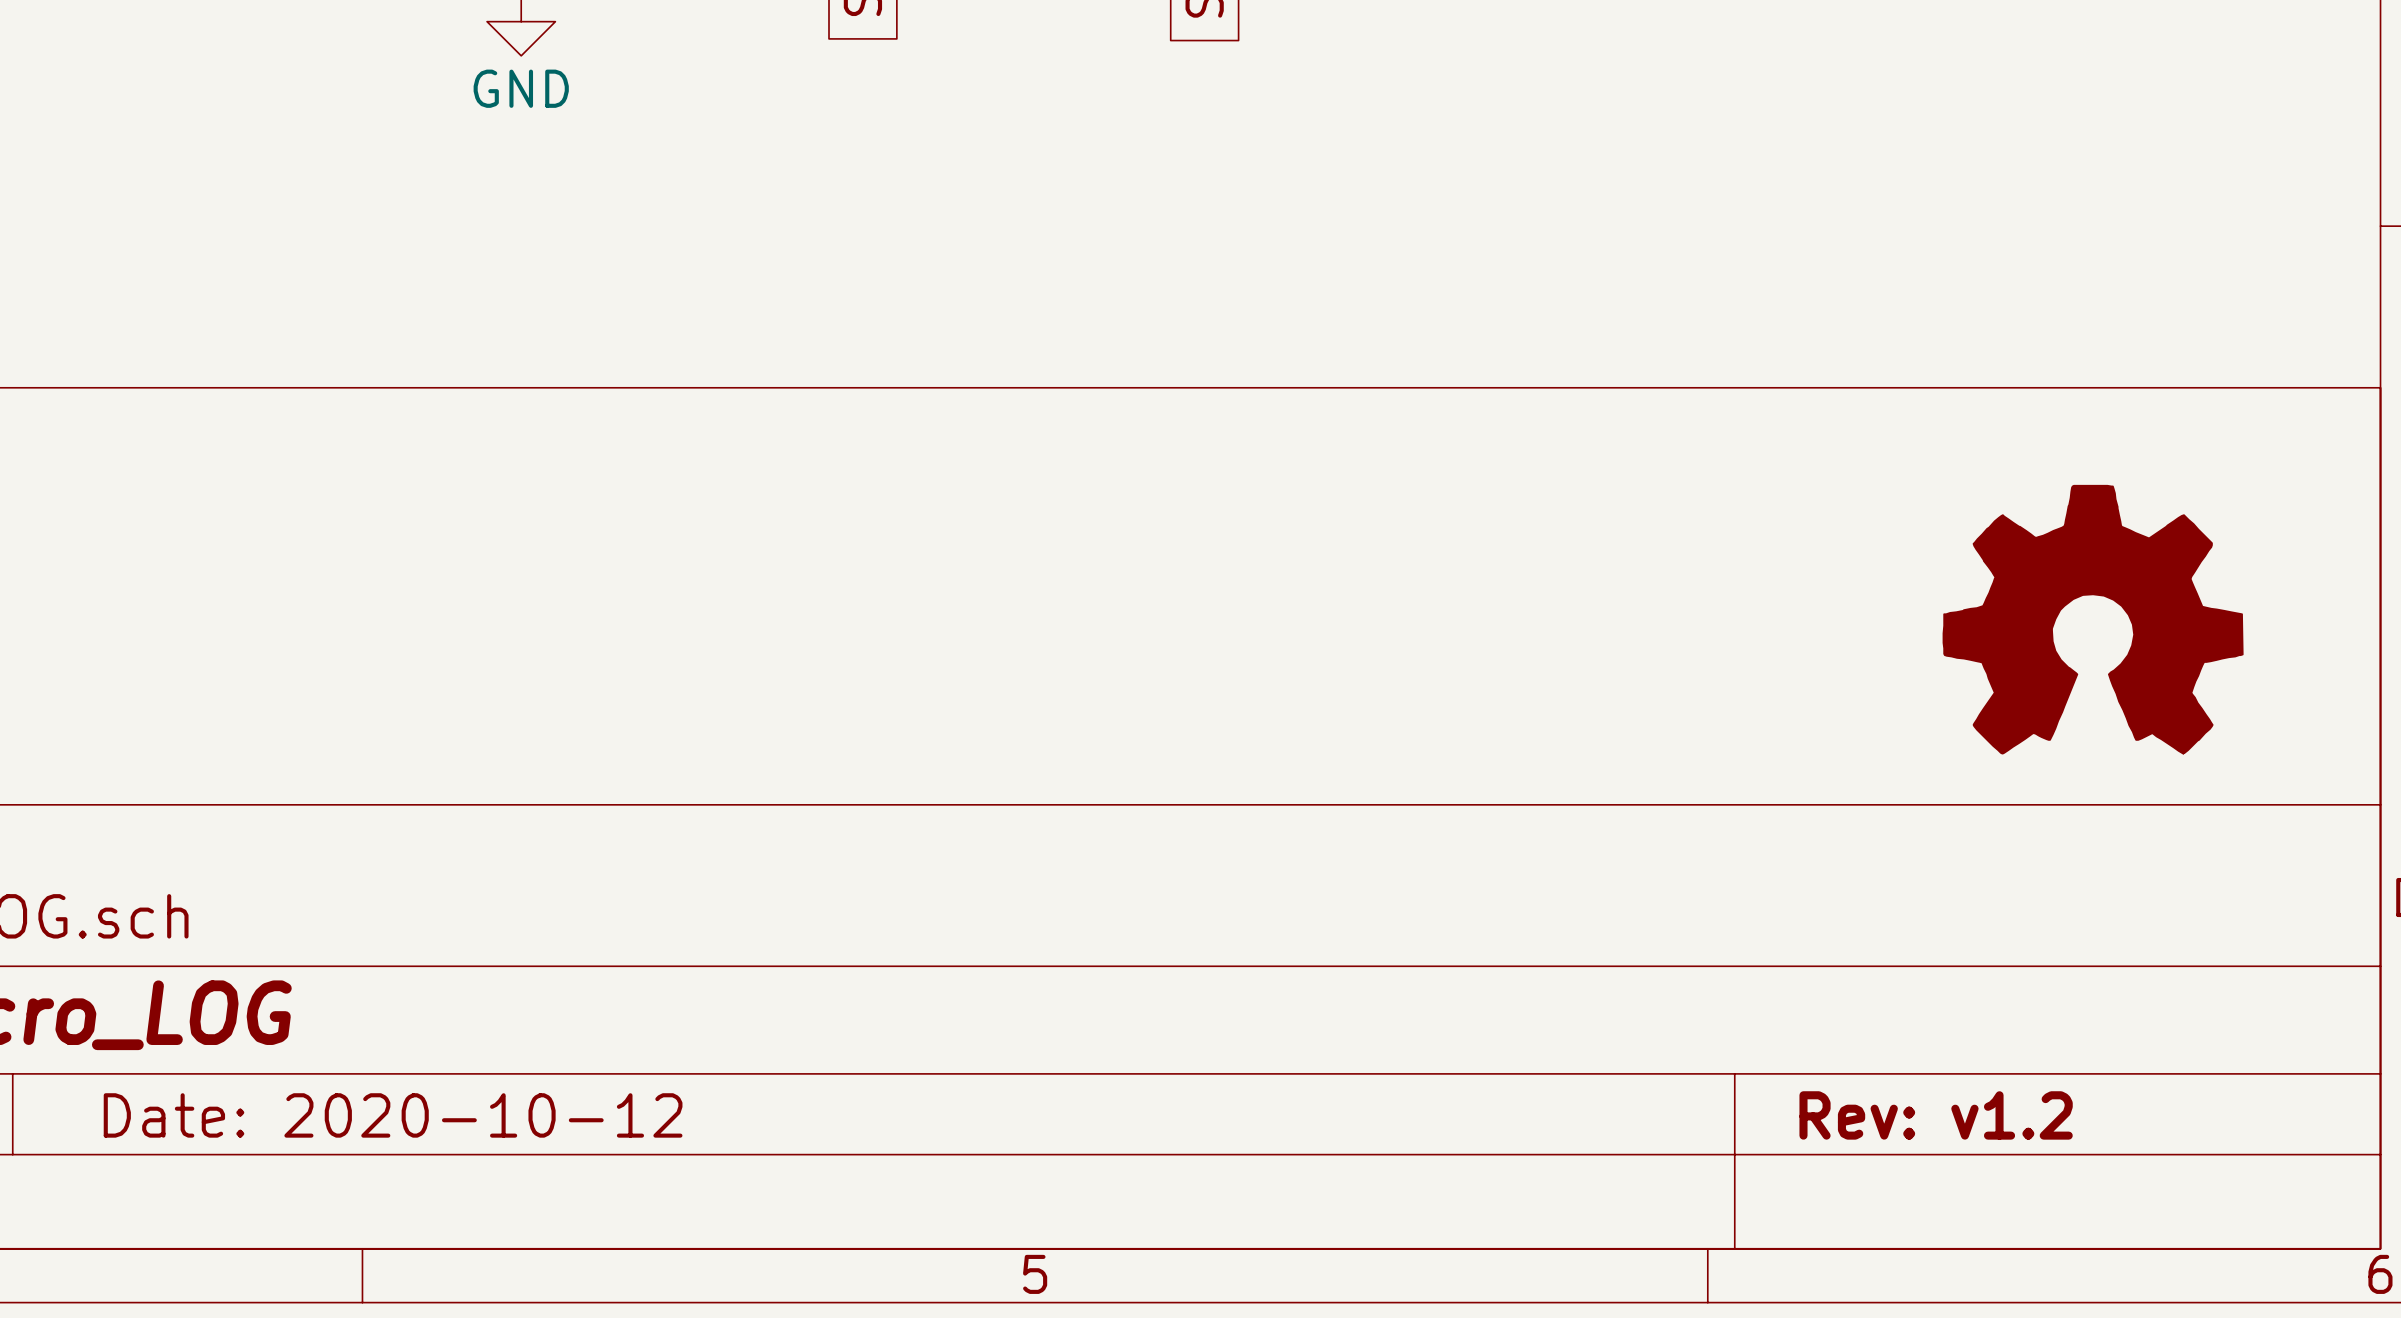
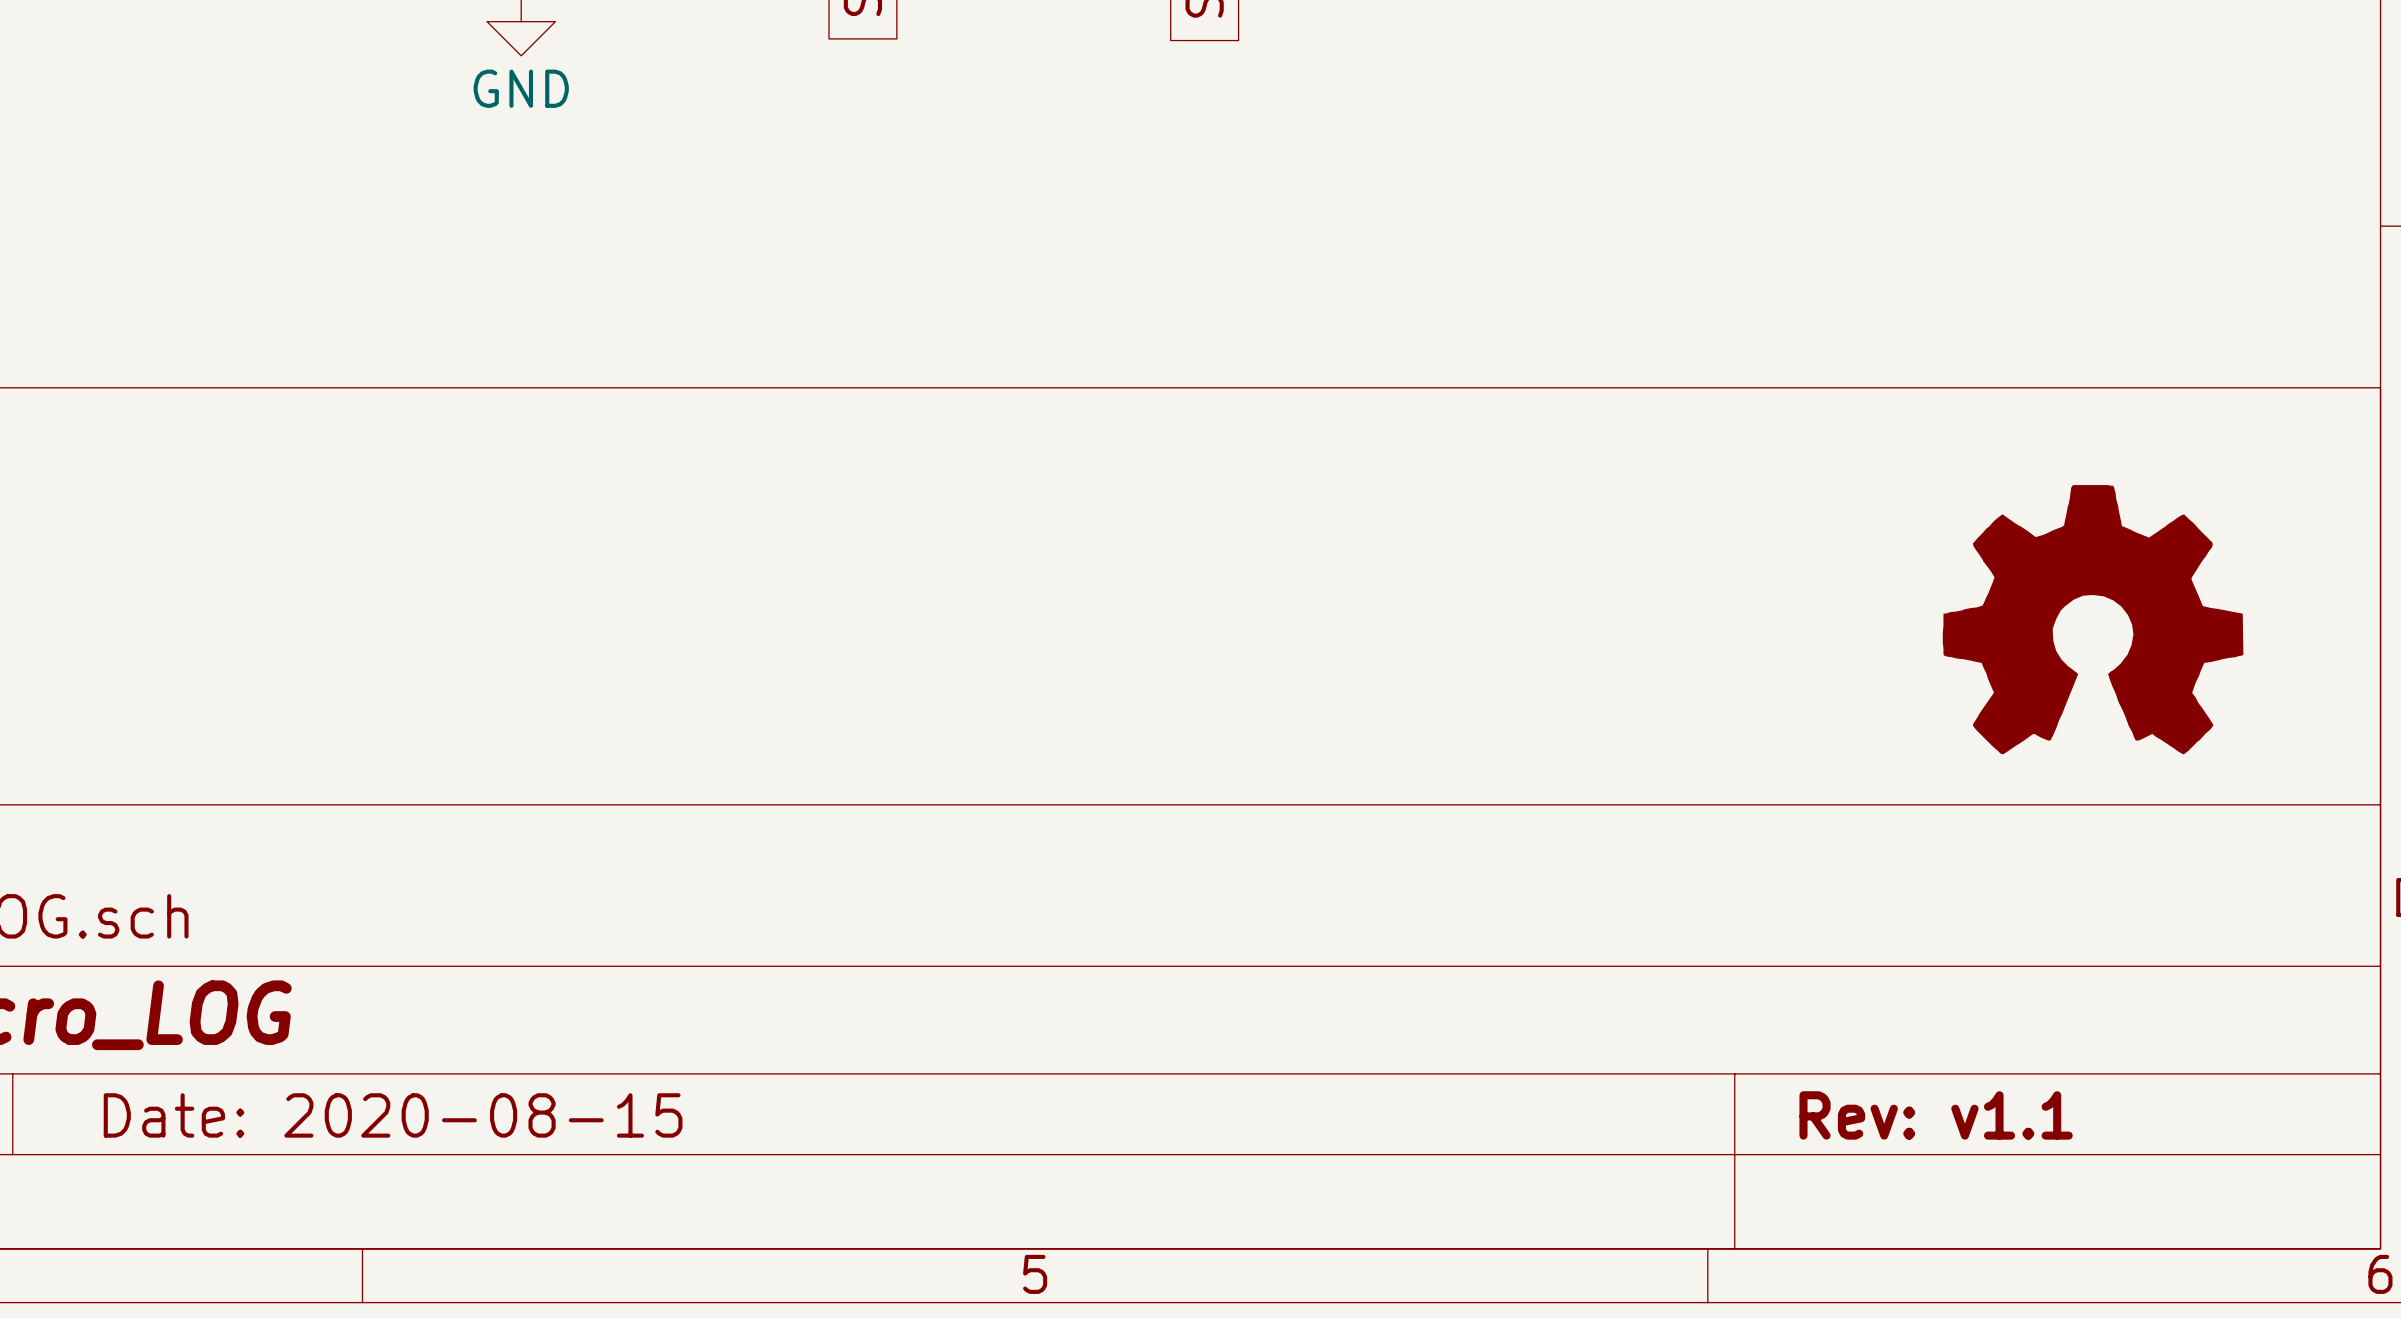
title block: Date: 2020-10-12 (393, 1115) -> Date: 2020-08-15 (393, 1115)
title block: Rev: v1.2 (1936, 1115) -> Rev: v1.1 (1936, 1115)

